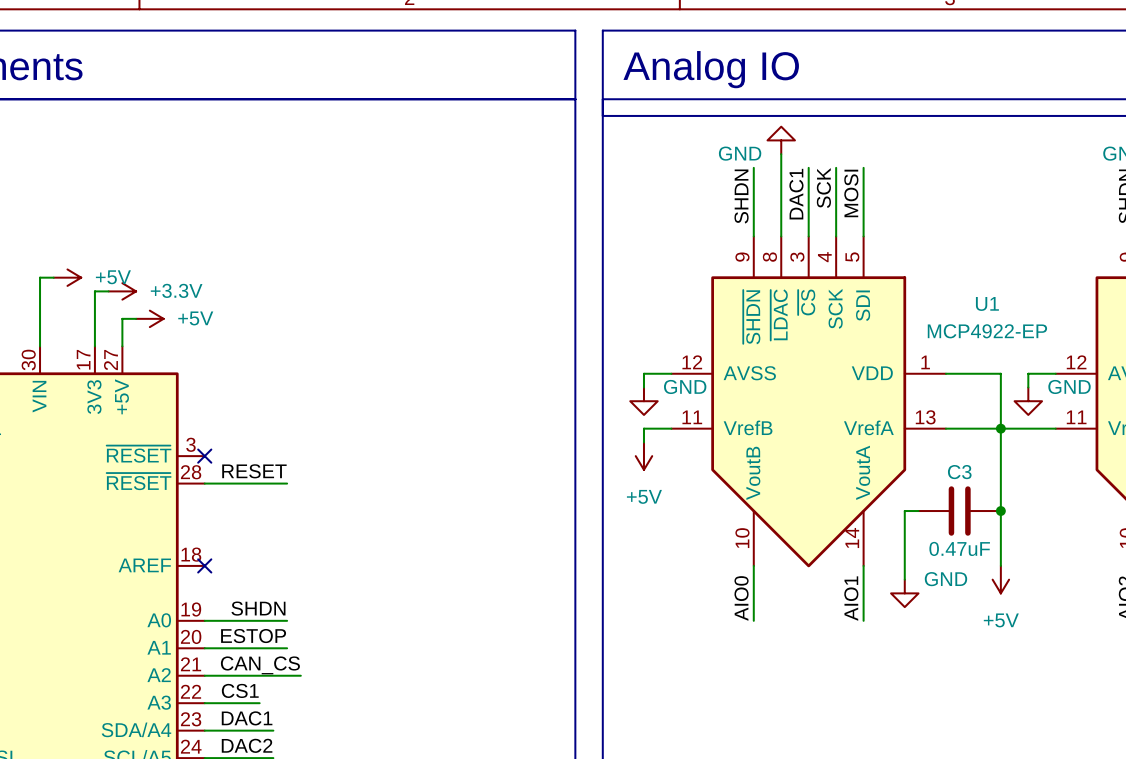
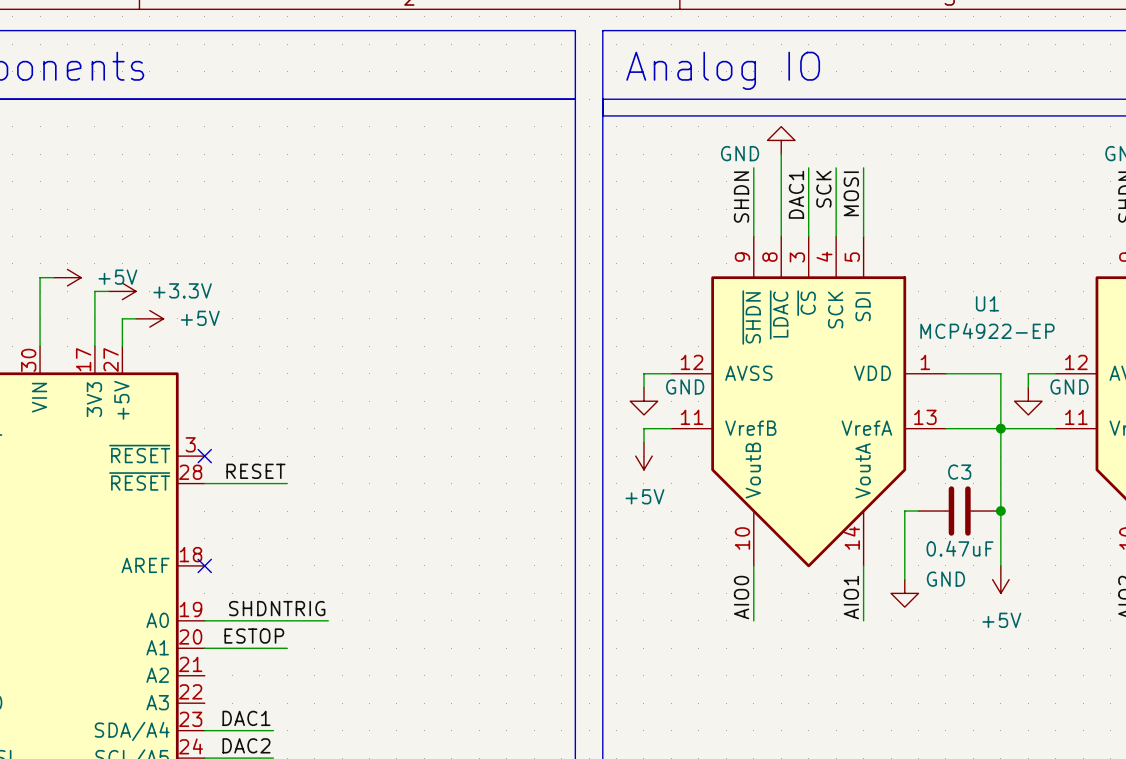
label: SHDN (258, 608) -> SHDNTRIG (277, 608)
wire: none -> (287, 620) (328, 620)
label: CAN_CS (260, 665) -> none
wire: (204, 675) (300, 675) -> none
label: CS1 (240, 690) -> none
wire: (204, 703) (259, 703) -> none

